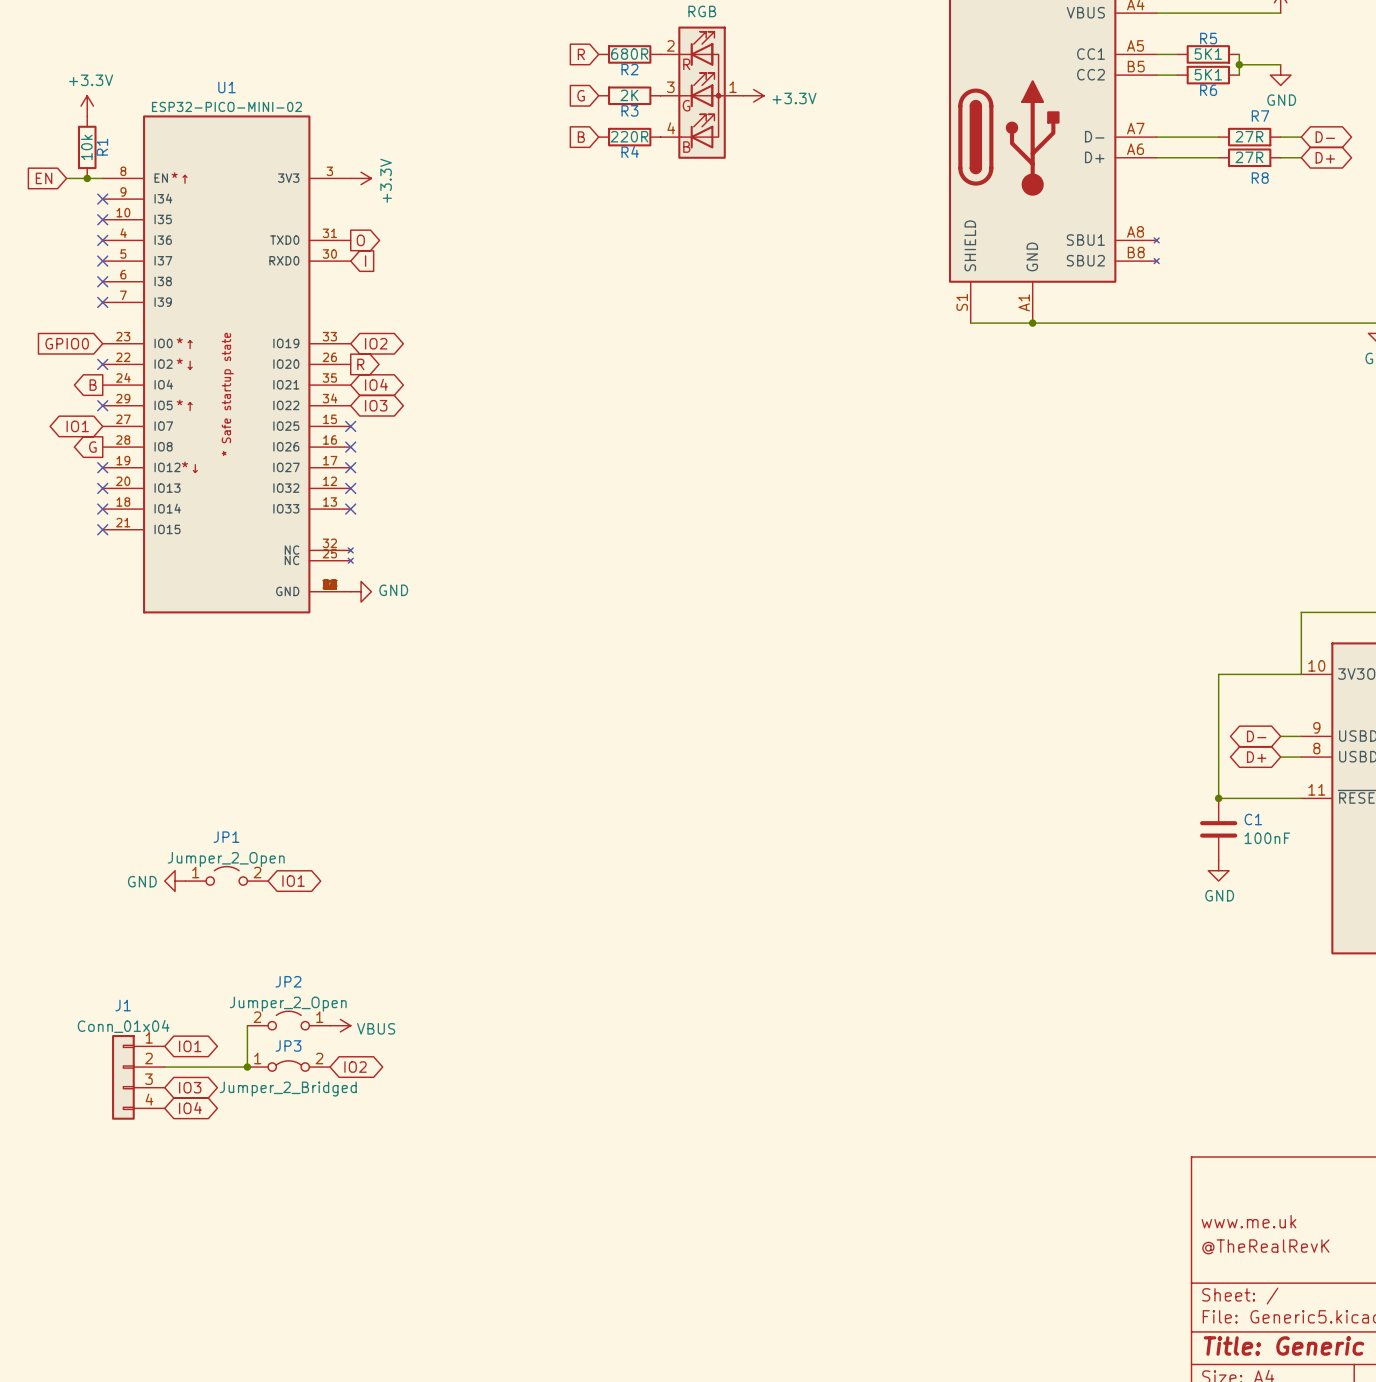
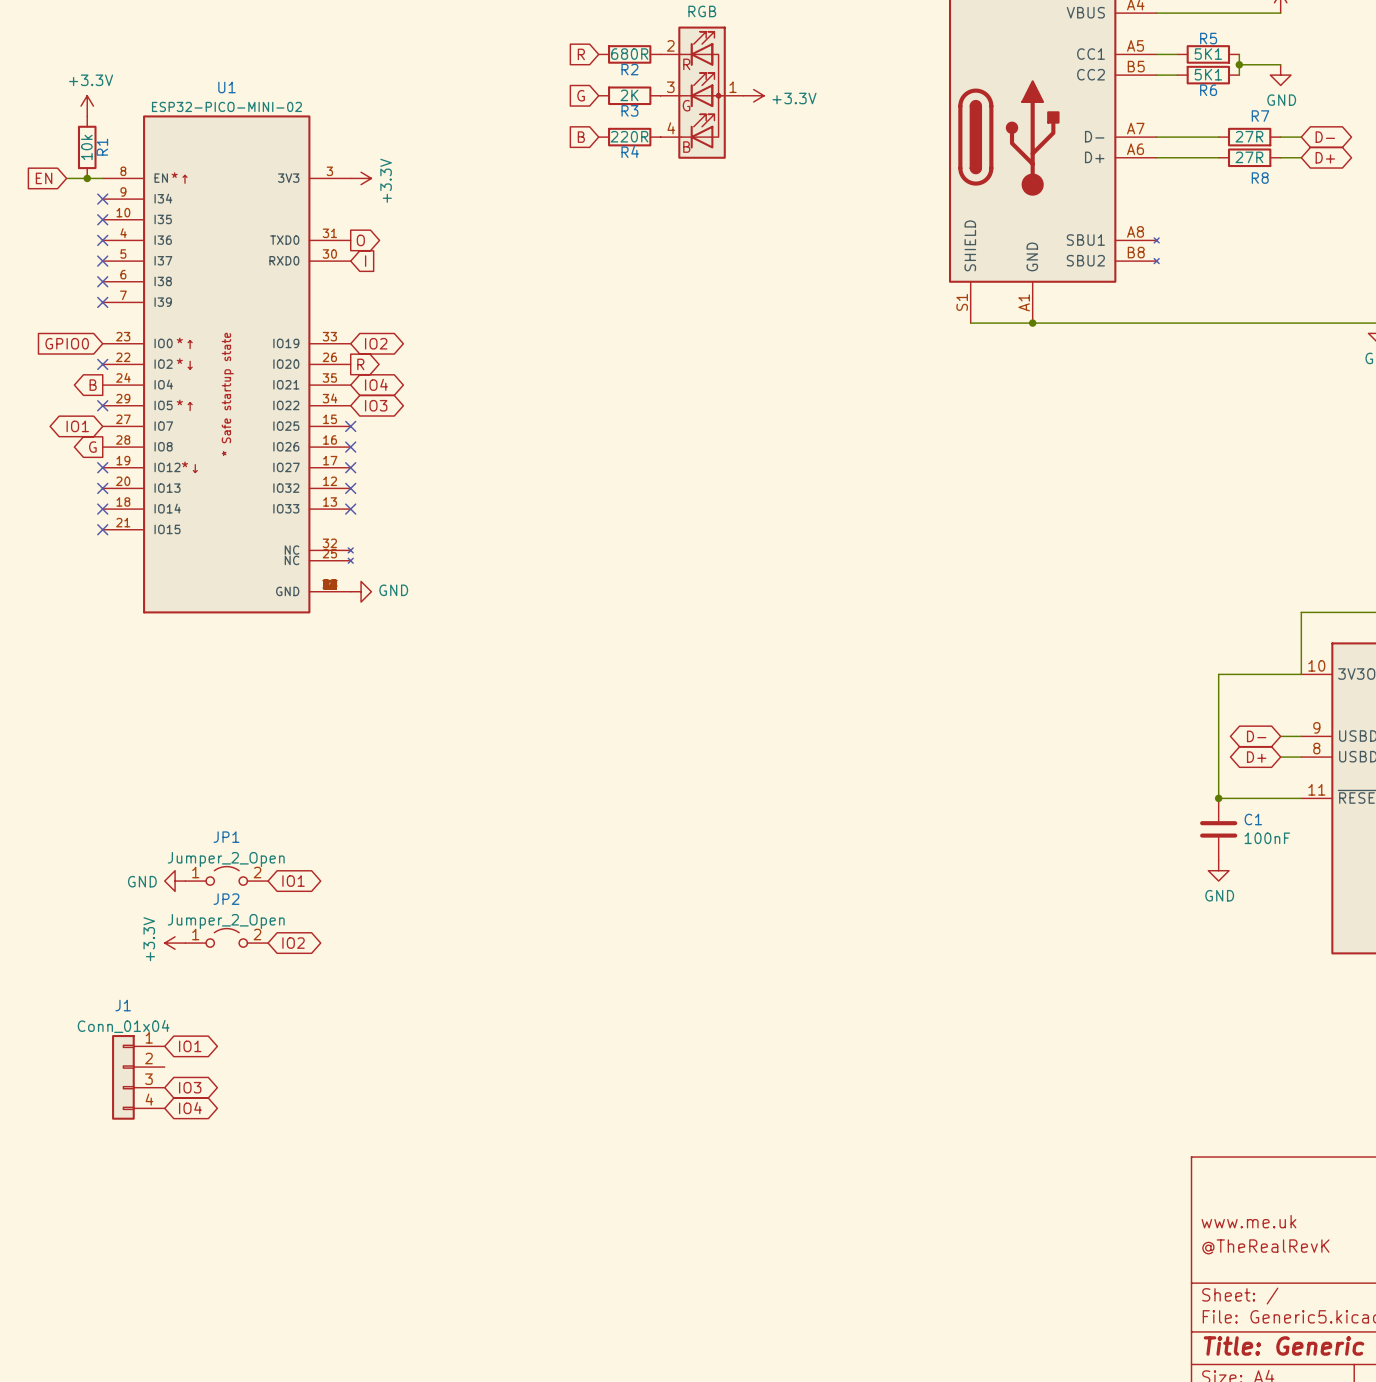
power symbol: none -> +3.3V (175, 943)
JP2 flip: as is (288, 1020) -> left-right (226, 937)
JP2 position: (288, 1020) -> (226, 937)
wire: (247, 1025) (247, 1067) (164, 1067) -> none
power symbol: VBUS (340, 1025) -> none
JP3: Jumper_2_Bridged (288, 1066) -> none
junction: (247, 1067) -> none
global label position: IO2 (355, 1067) -> IO2 (293, 943)

